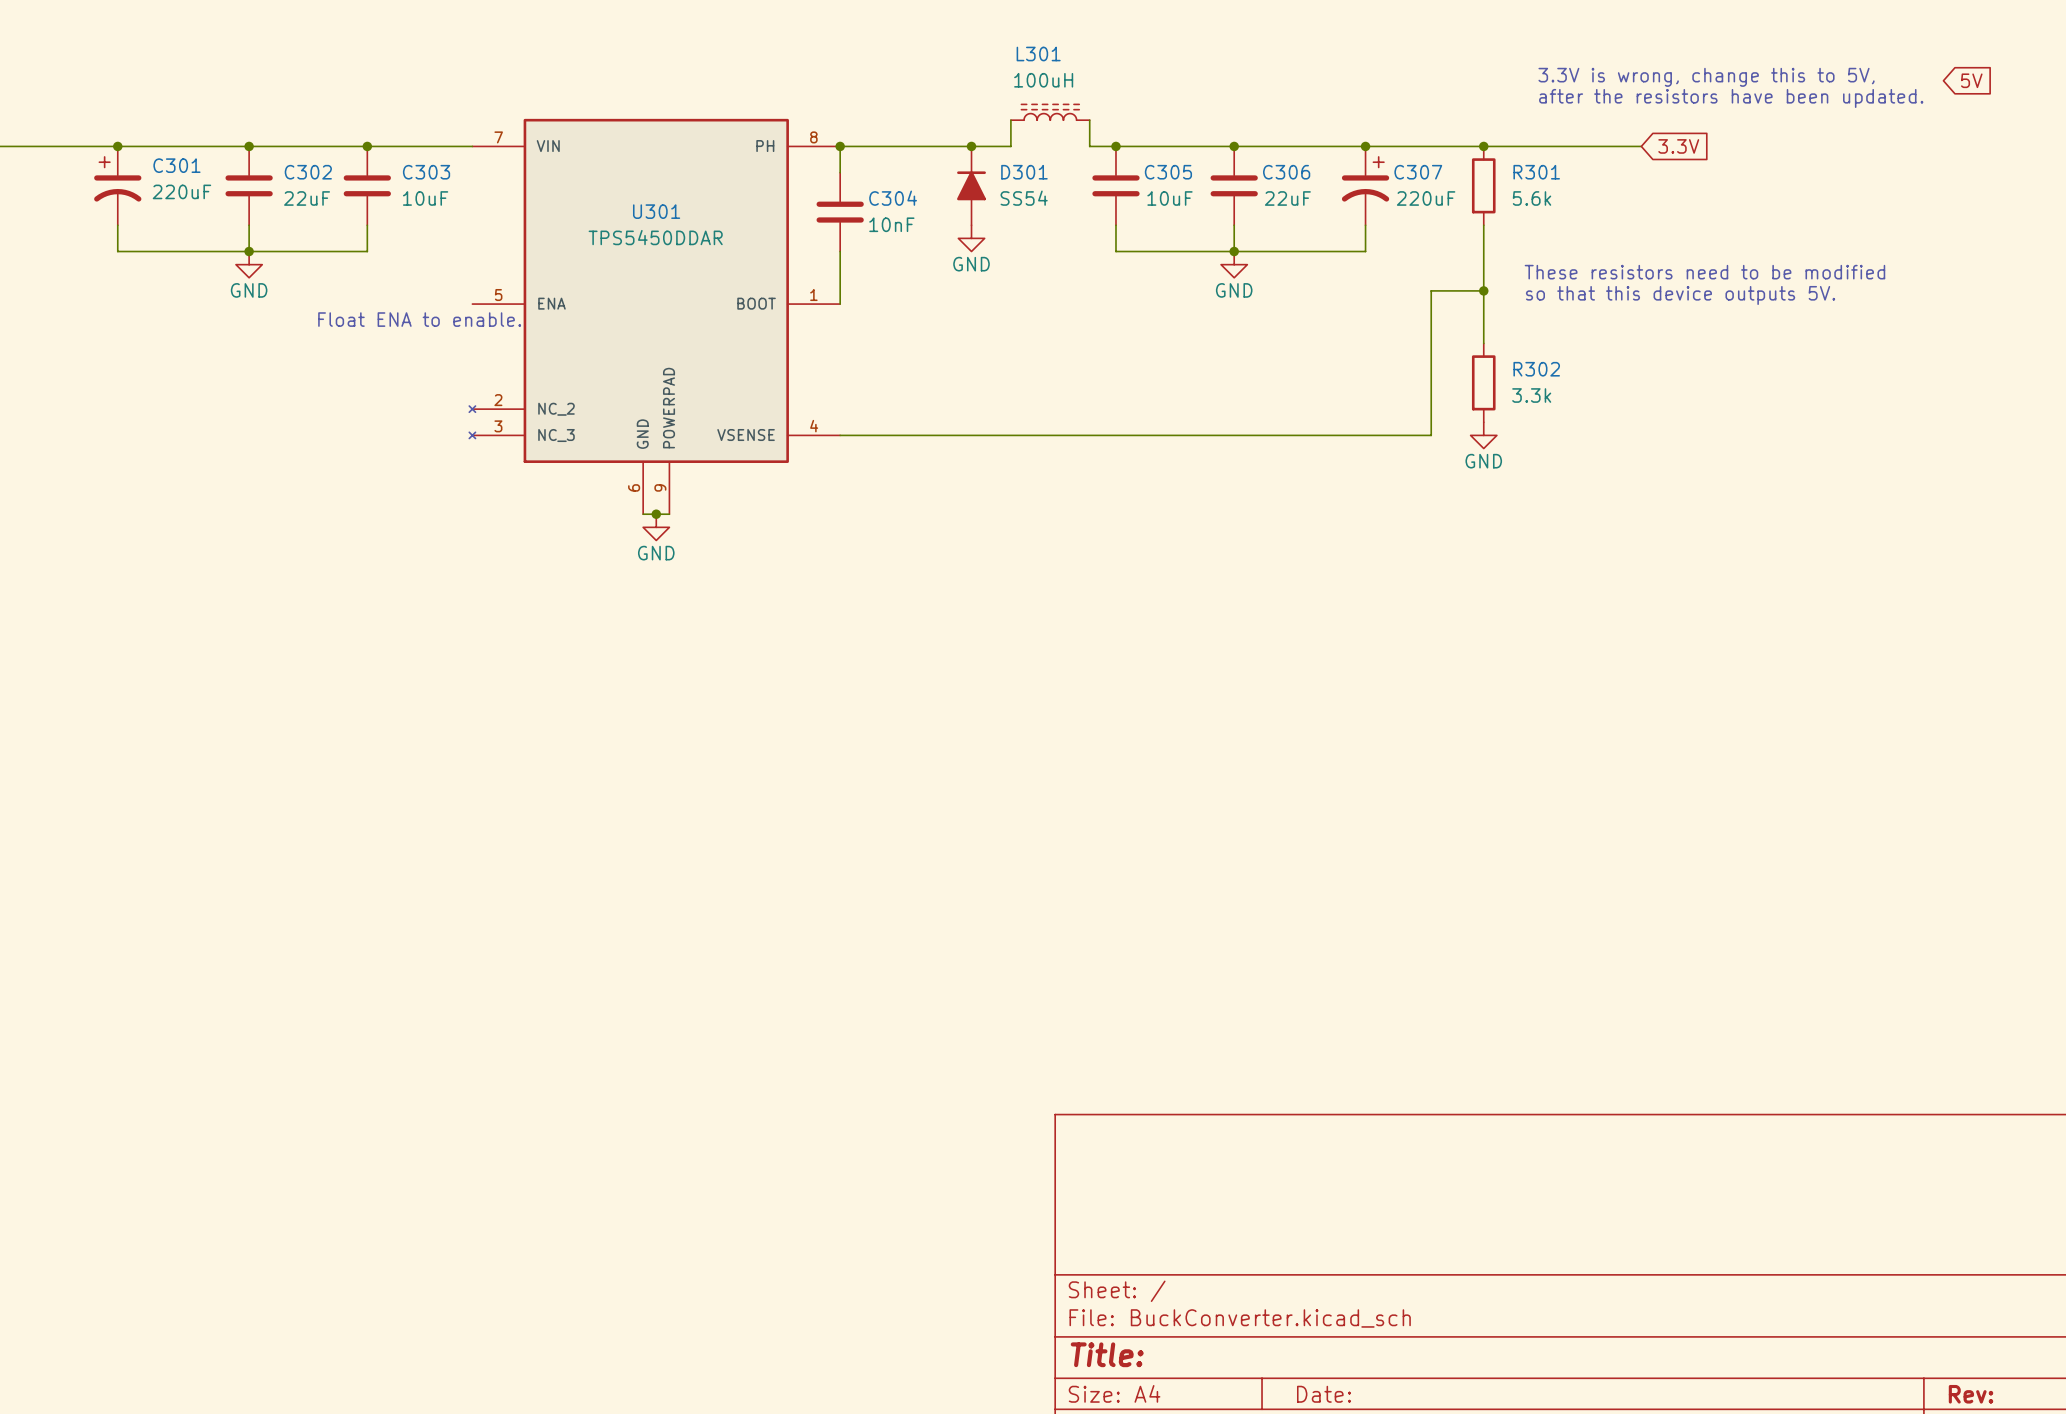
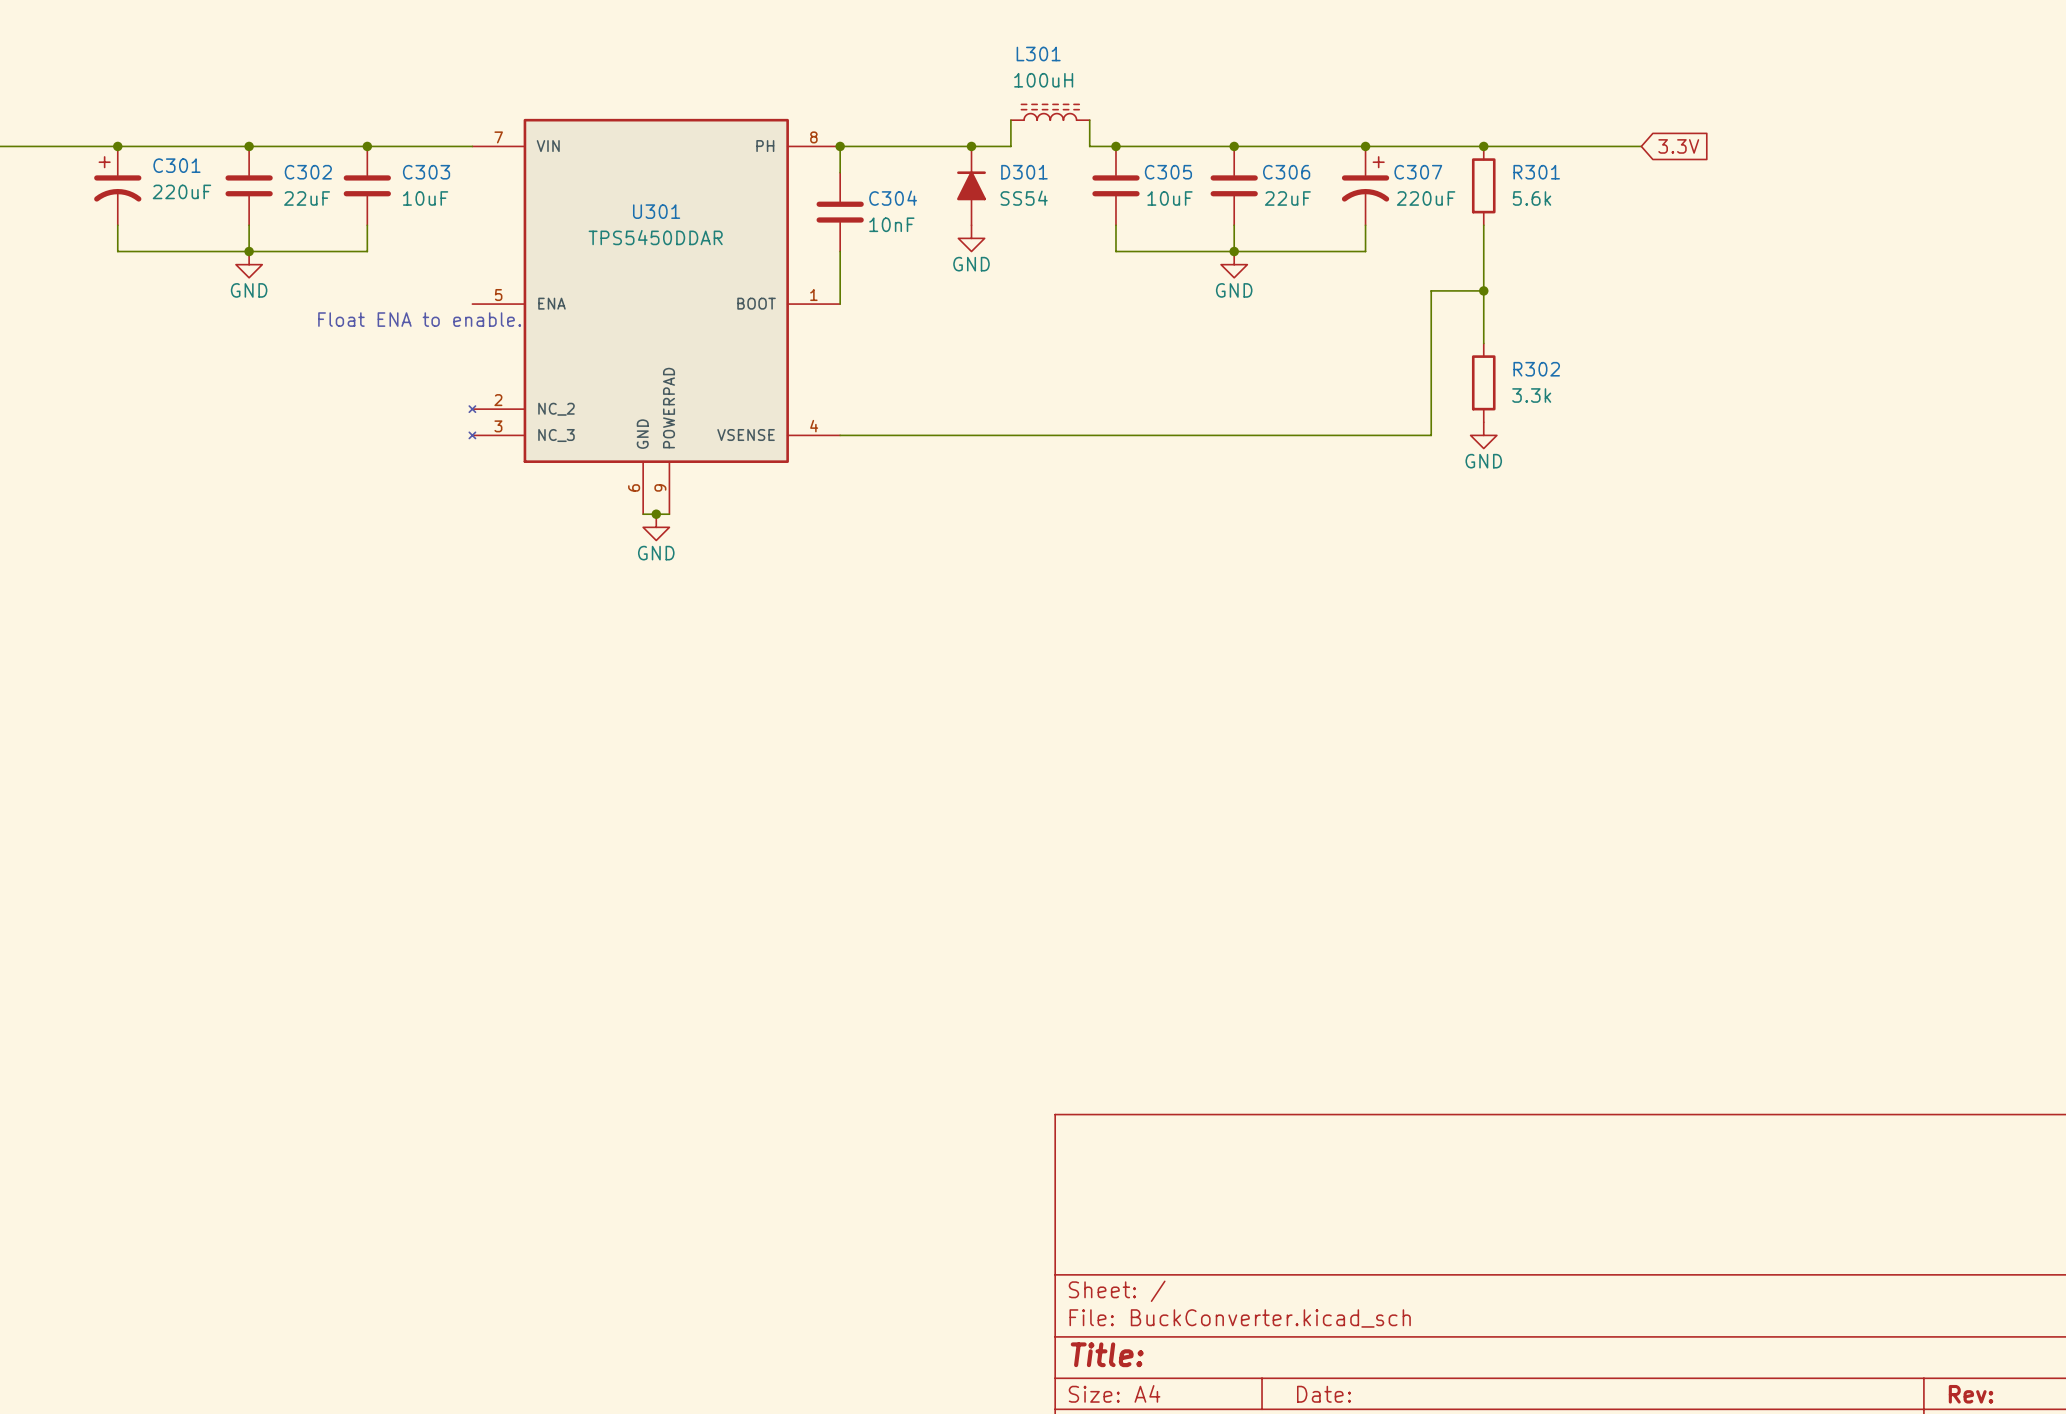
text: 3.3V is wrong, change this to 5V, (1706, 77) -> none
global label: 5V (1971, 80) -> none
text: after the resistors have been updated. (1731, 98) -> none
text: These resistors need to be modified (1704, 272) -> none
text: so that this device outputs 5V. (1680, 295) -> none

